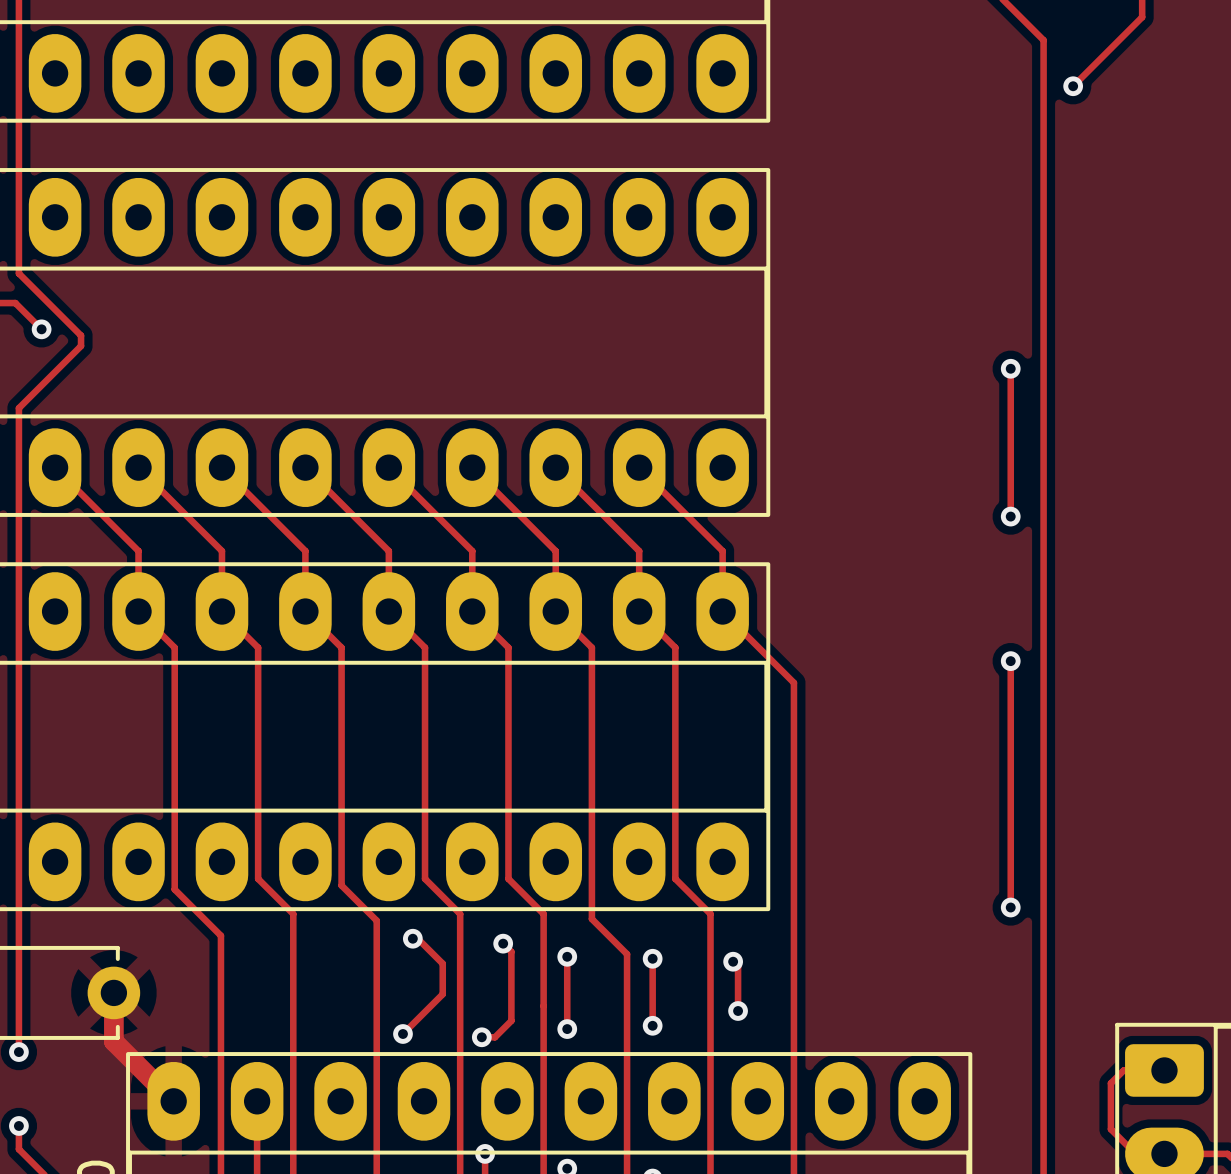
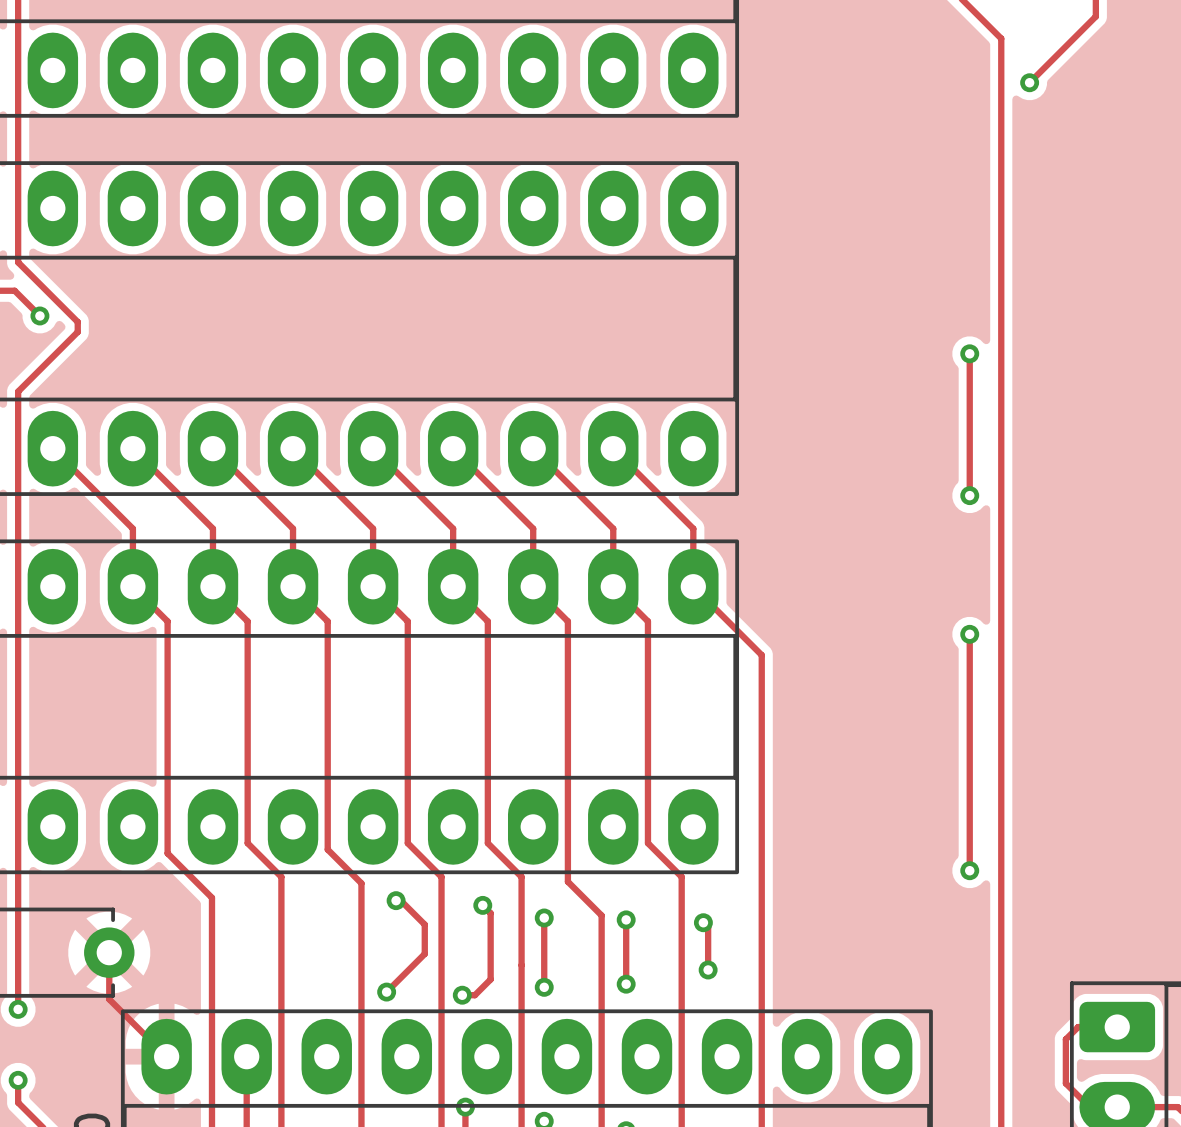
track width: thick (113, 992) (113, 1041) (173, 1101) -> thin (109, 952) (109, 999) (166, 1056)

